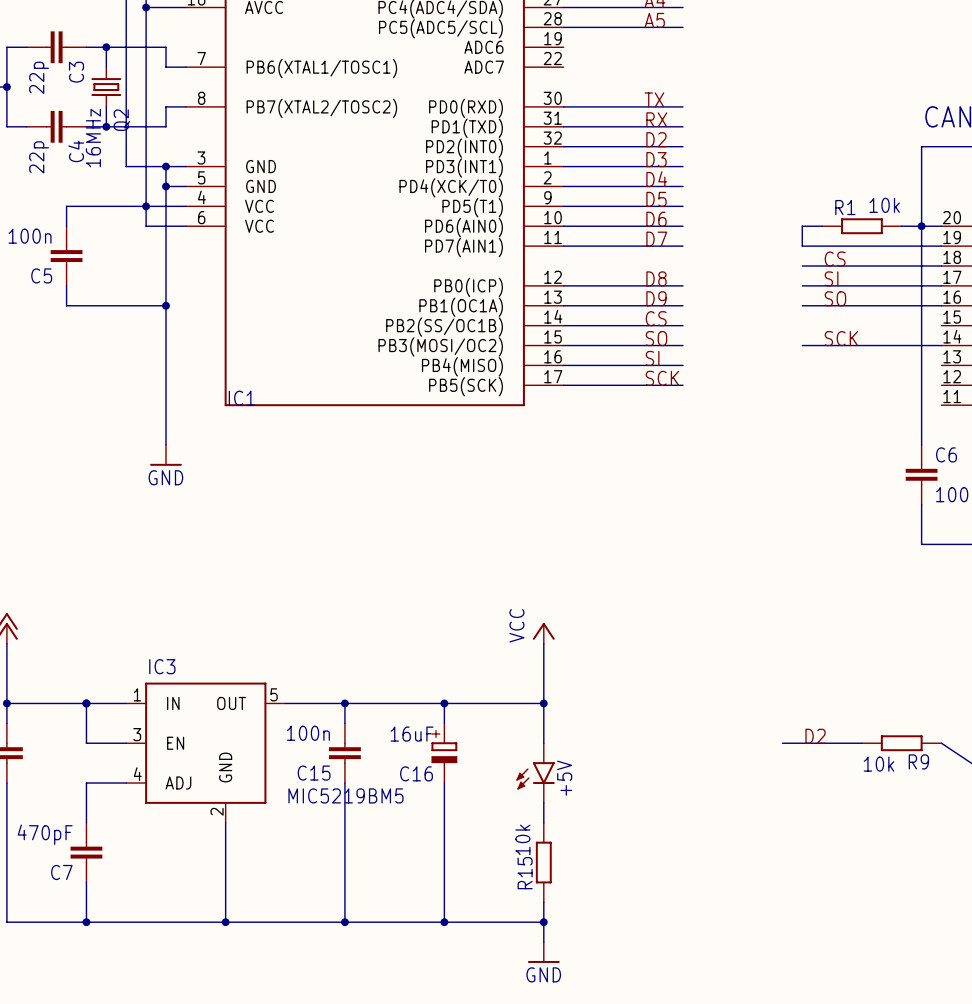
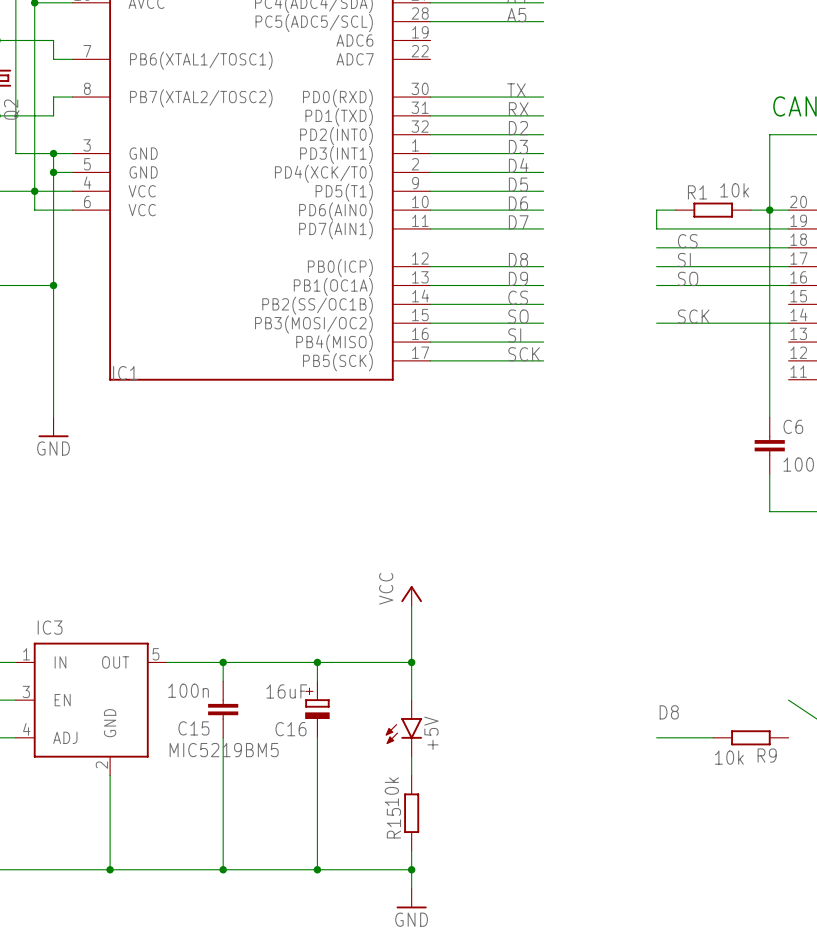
label: D2 (815, 736) -> none
wire: (782, 743) (861, 743) -> none
R9 position: (901, 743) -> (750, 737)
label: none -> D8 (669, 712)
wire: none -> (656, 737) (713, 737)

